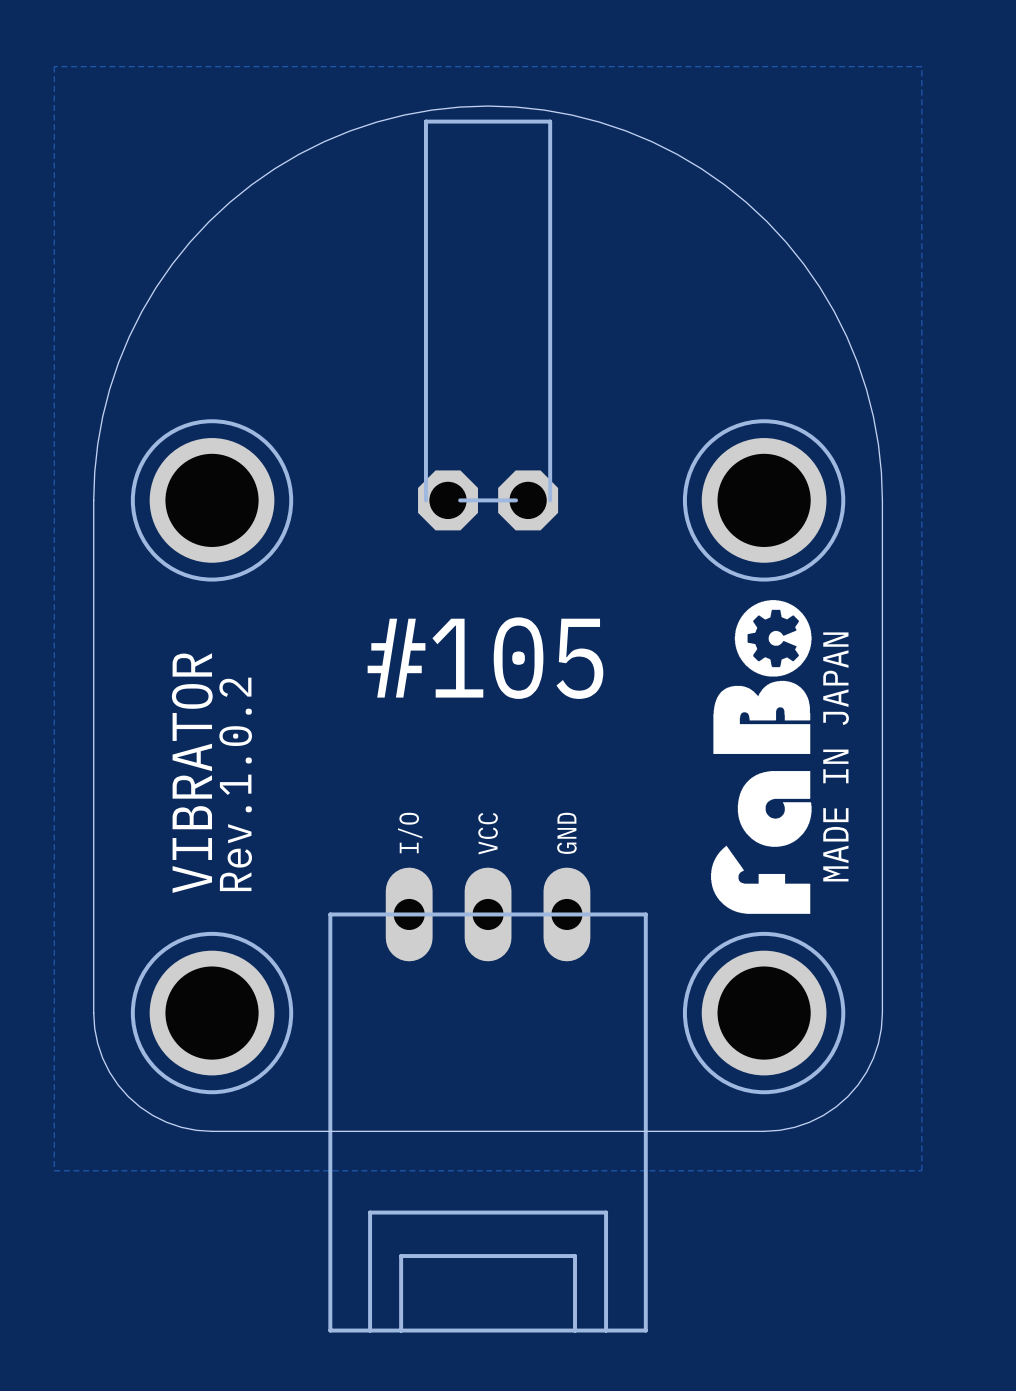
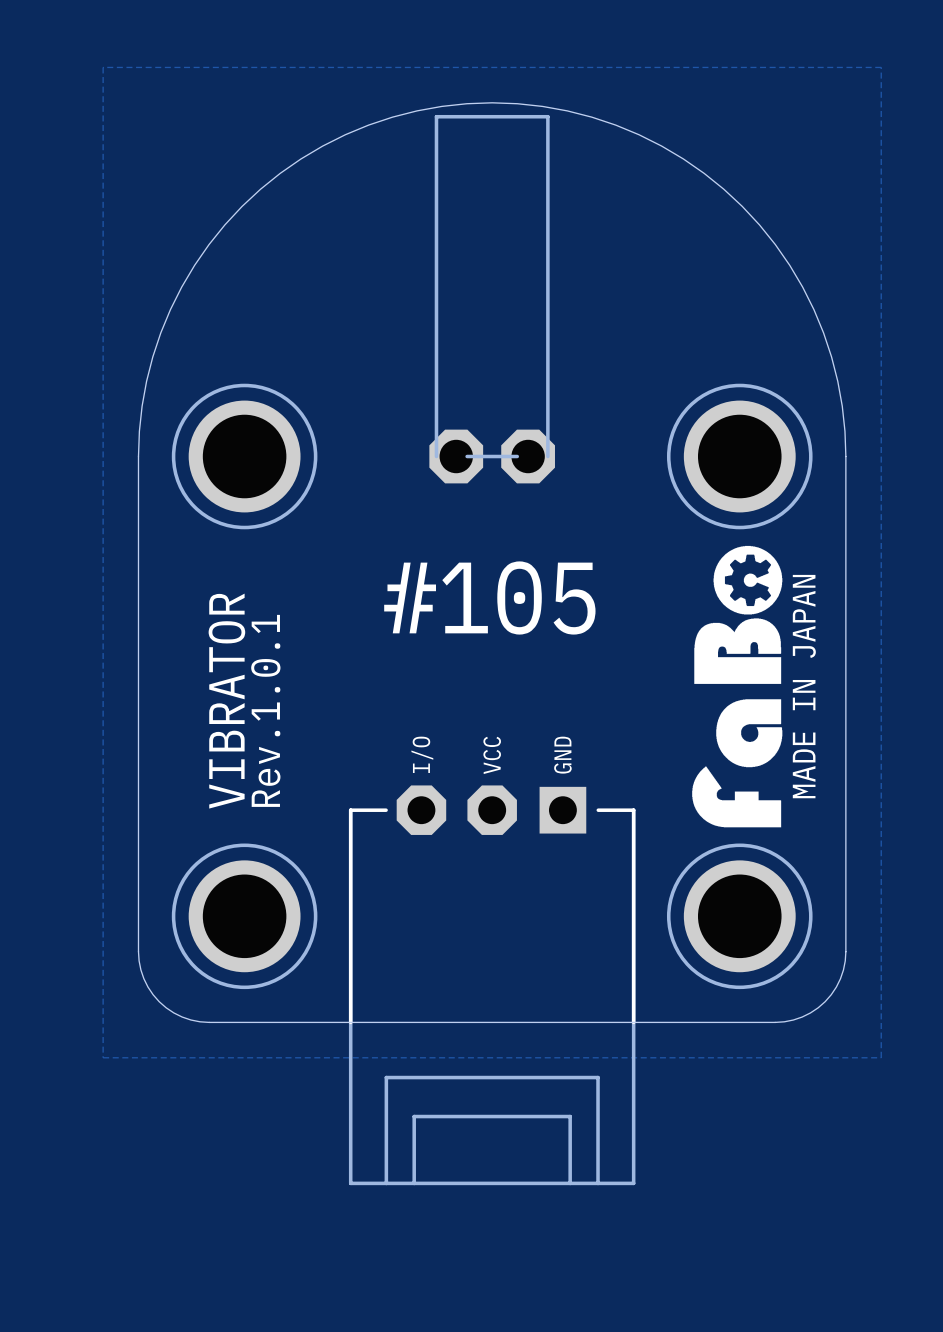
part footprint: [93, 106, 883, 1333] -> [138, 102, 846, 1186]
text: Rev.1.0.2 (235, 784) -> Rev.1.0.1 (265, 710)

